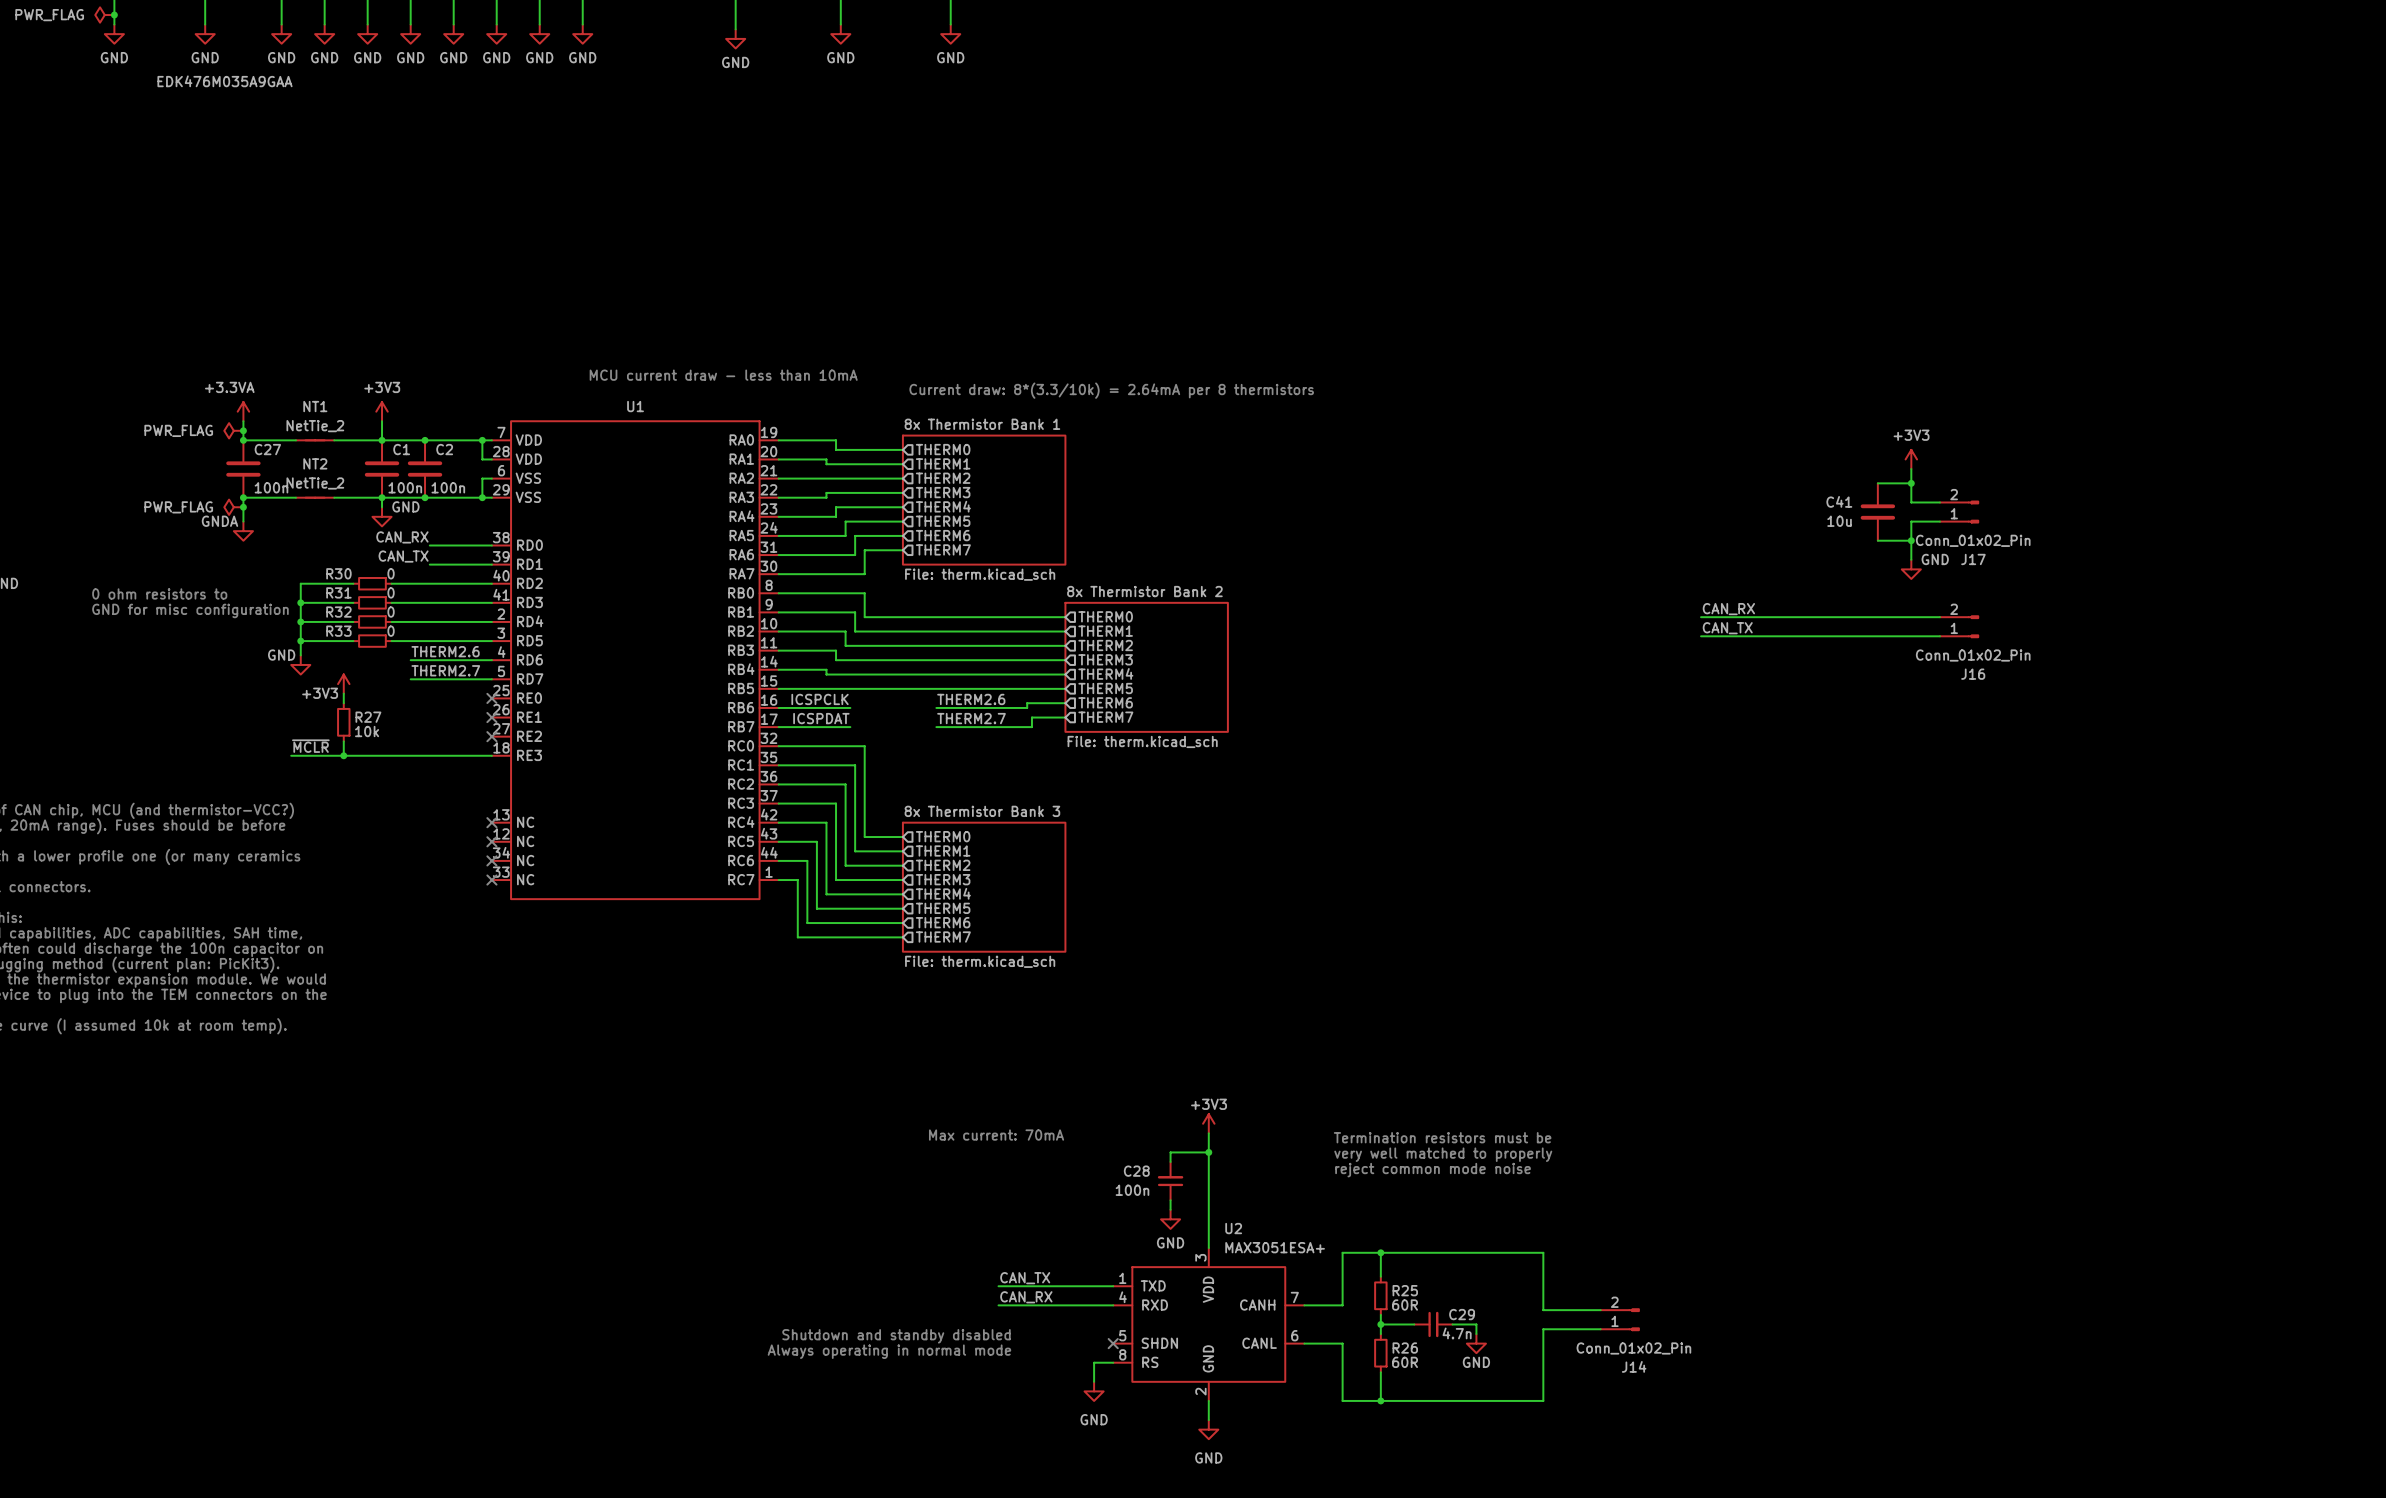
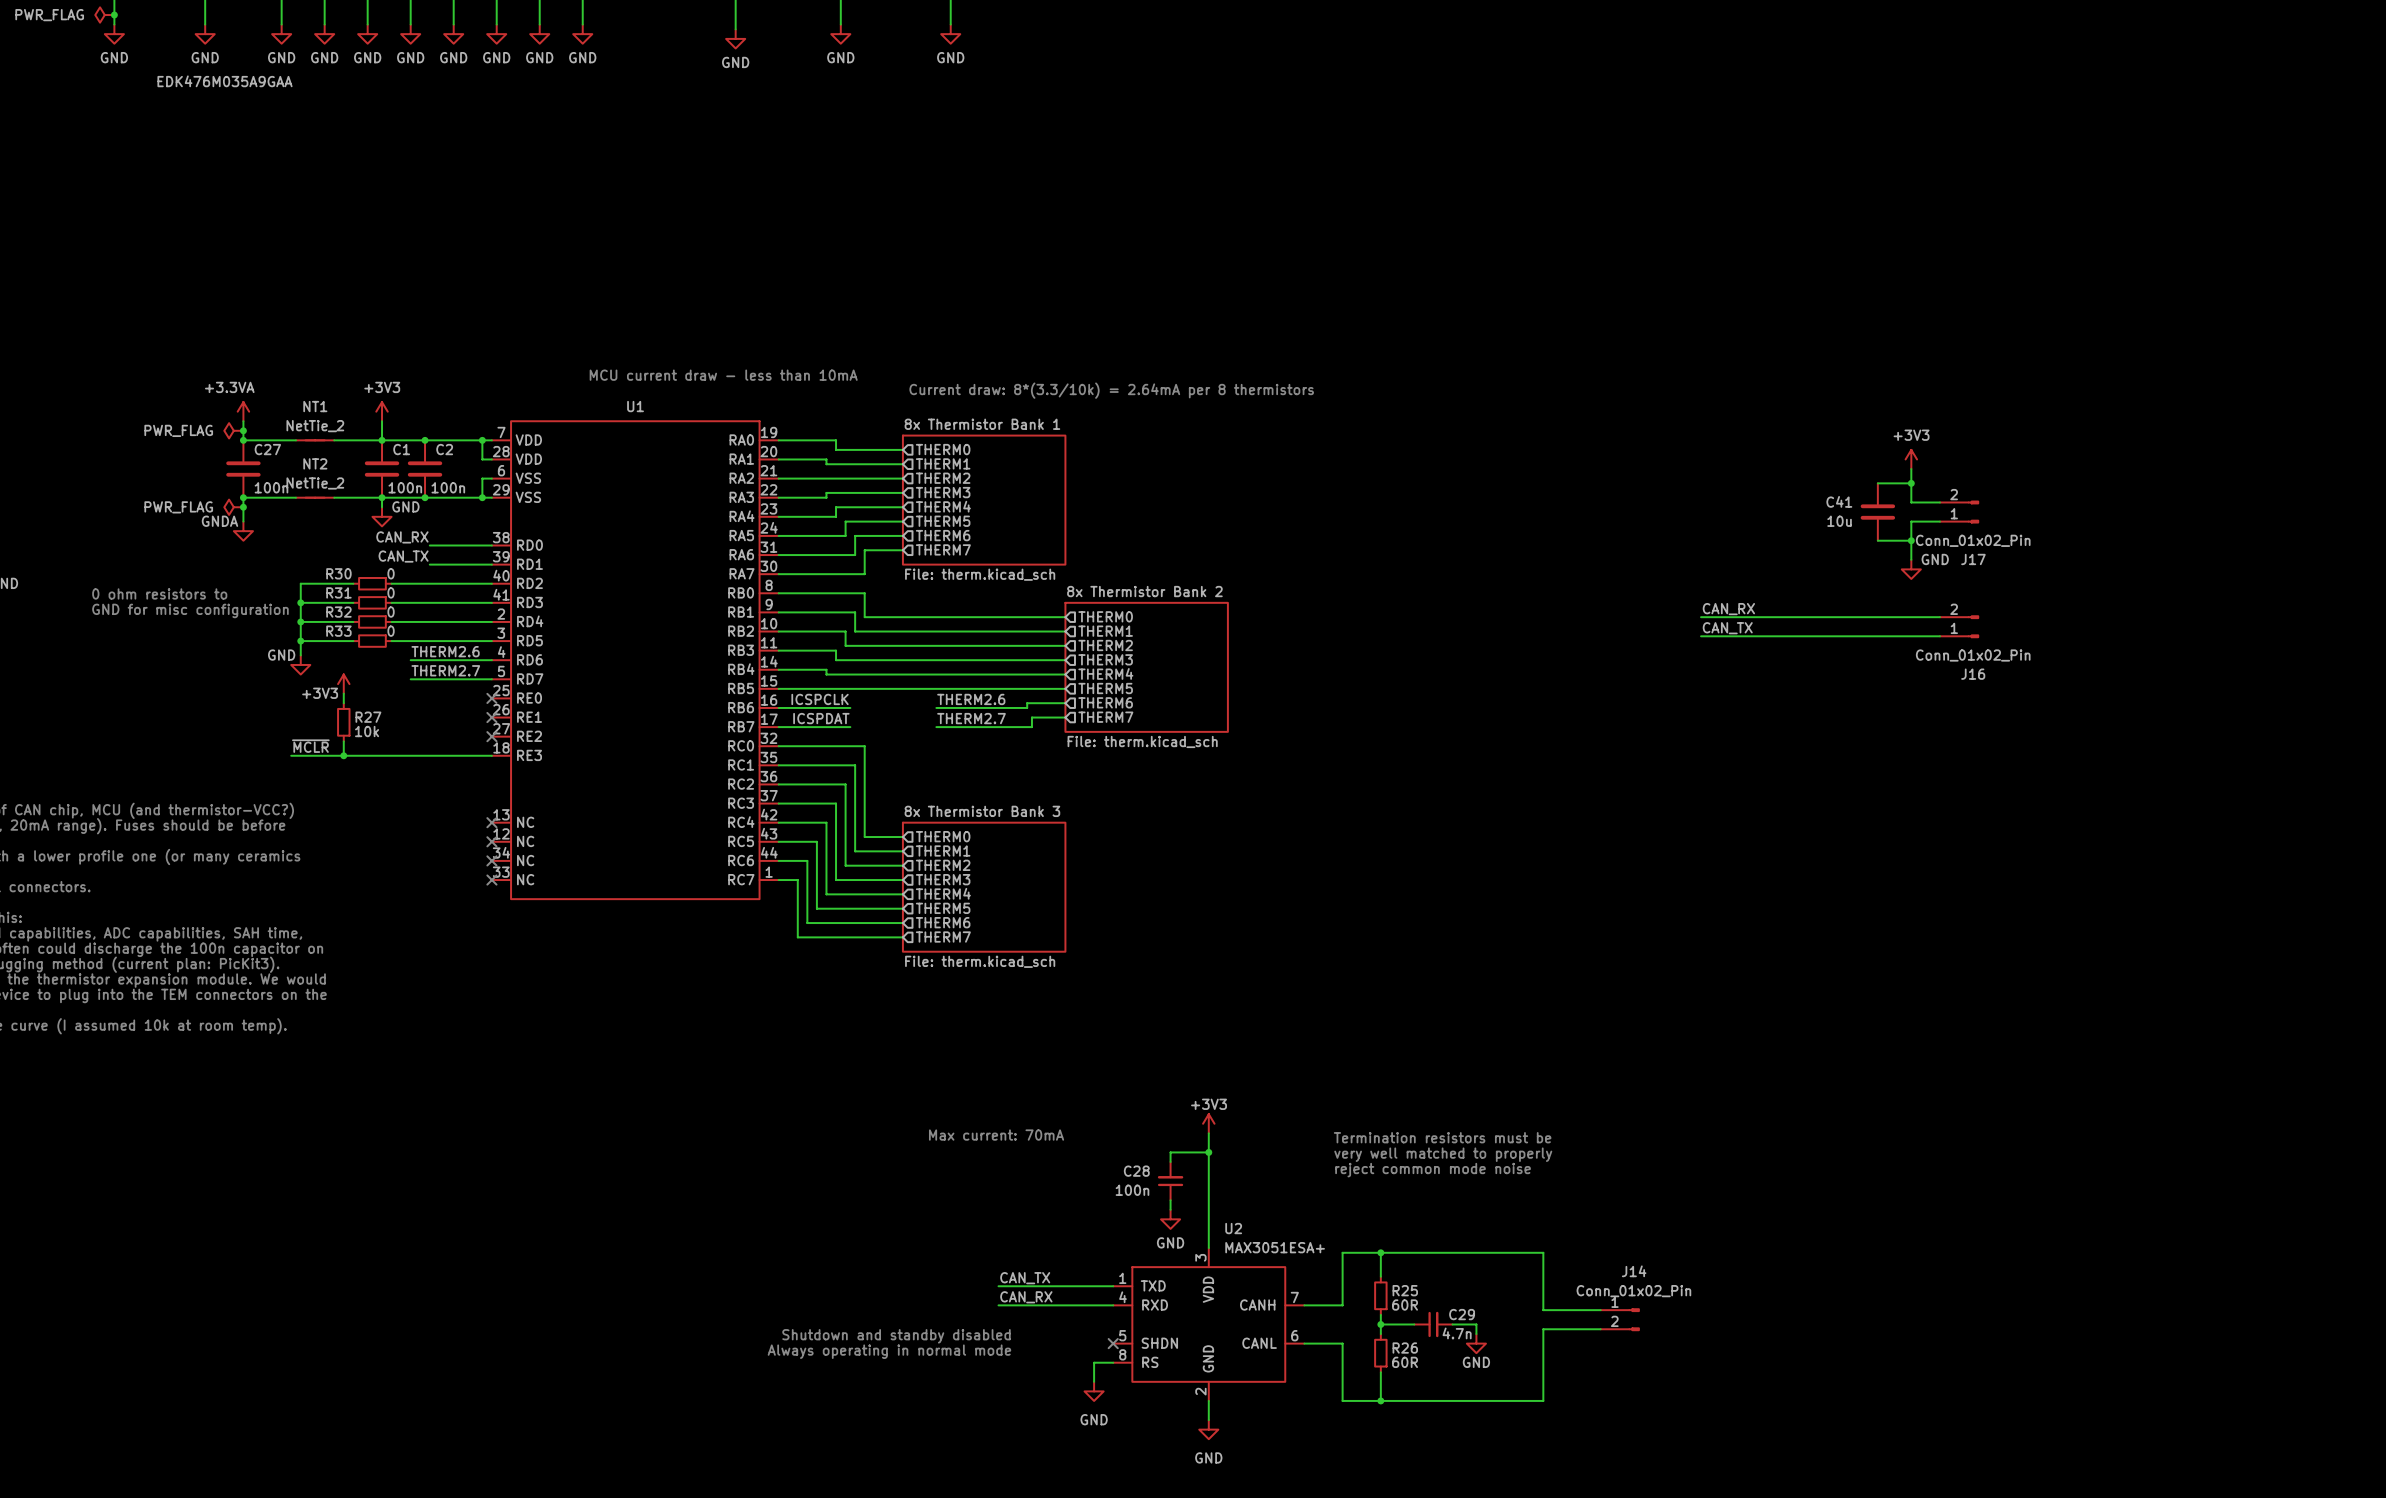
J14 flip: as is (1634, 1319) -> up-down (1634, 1319)

